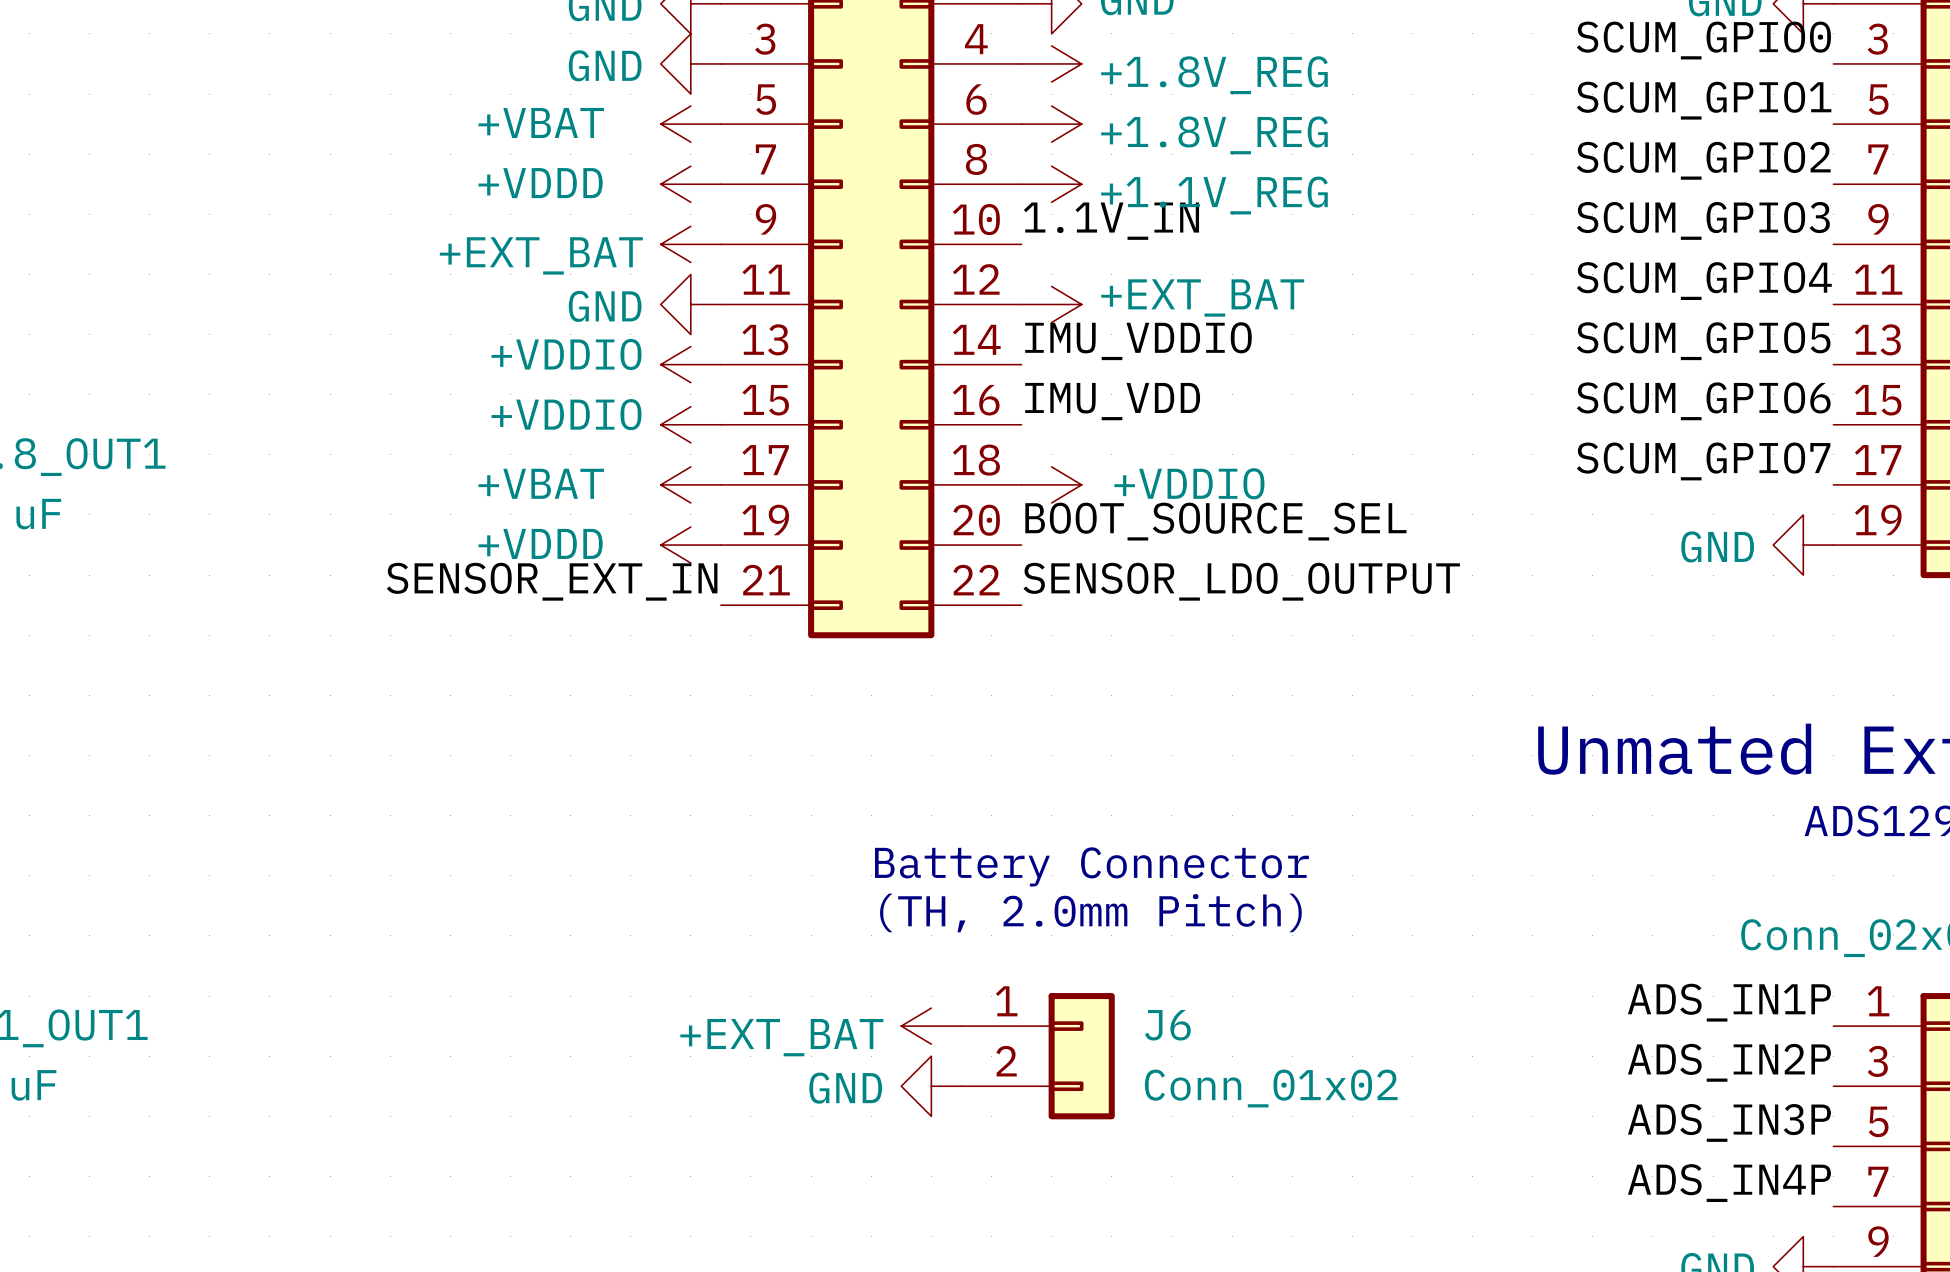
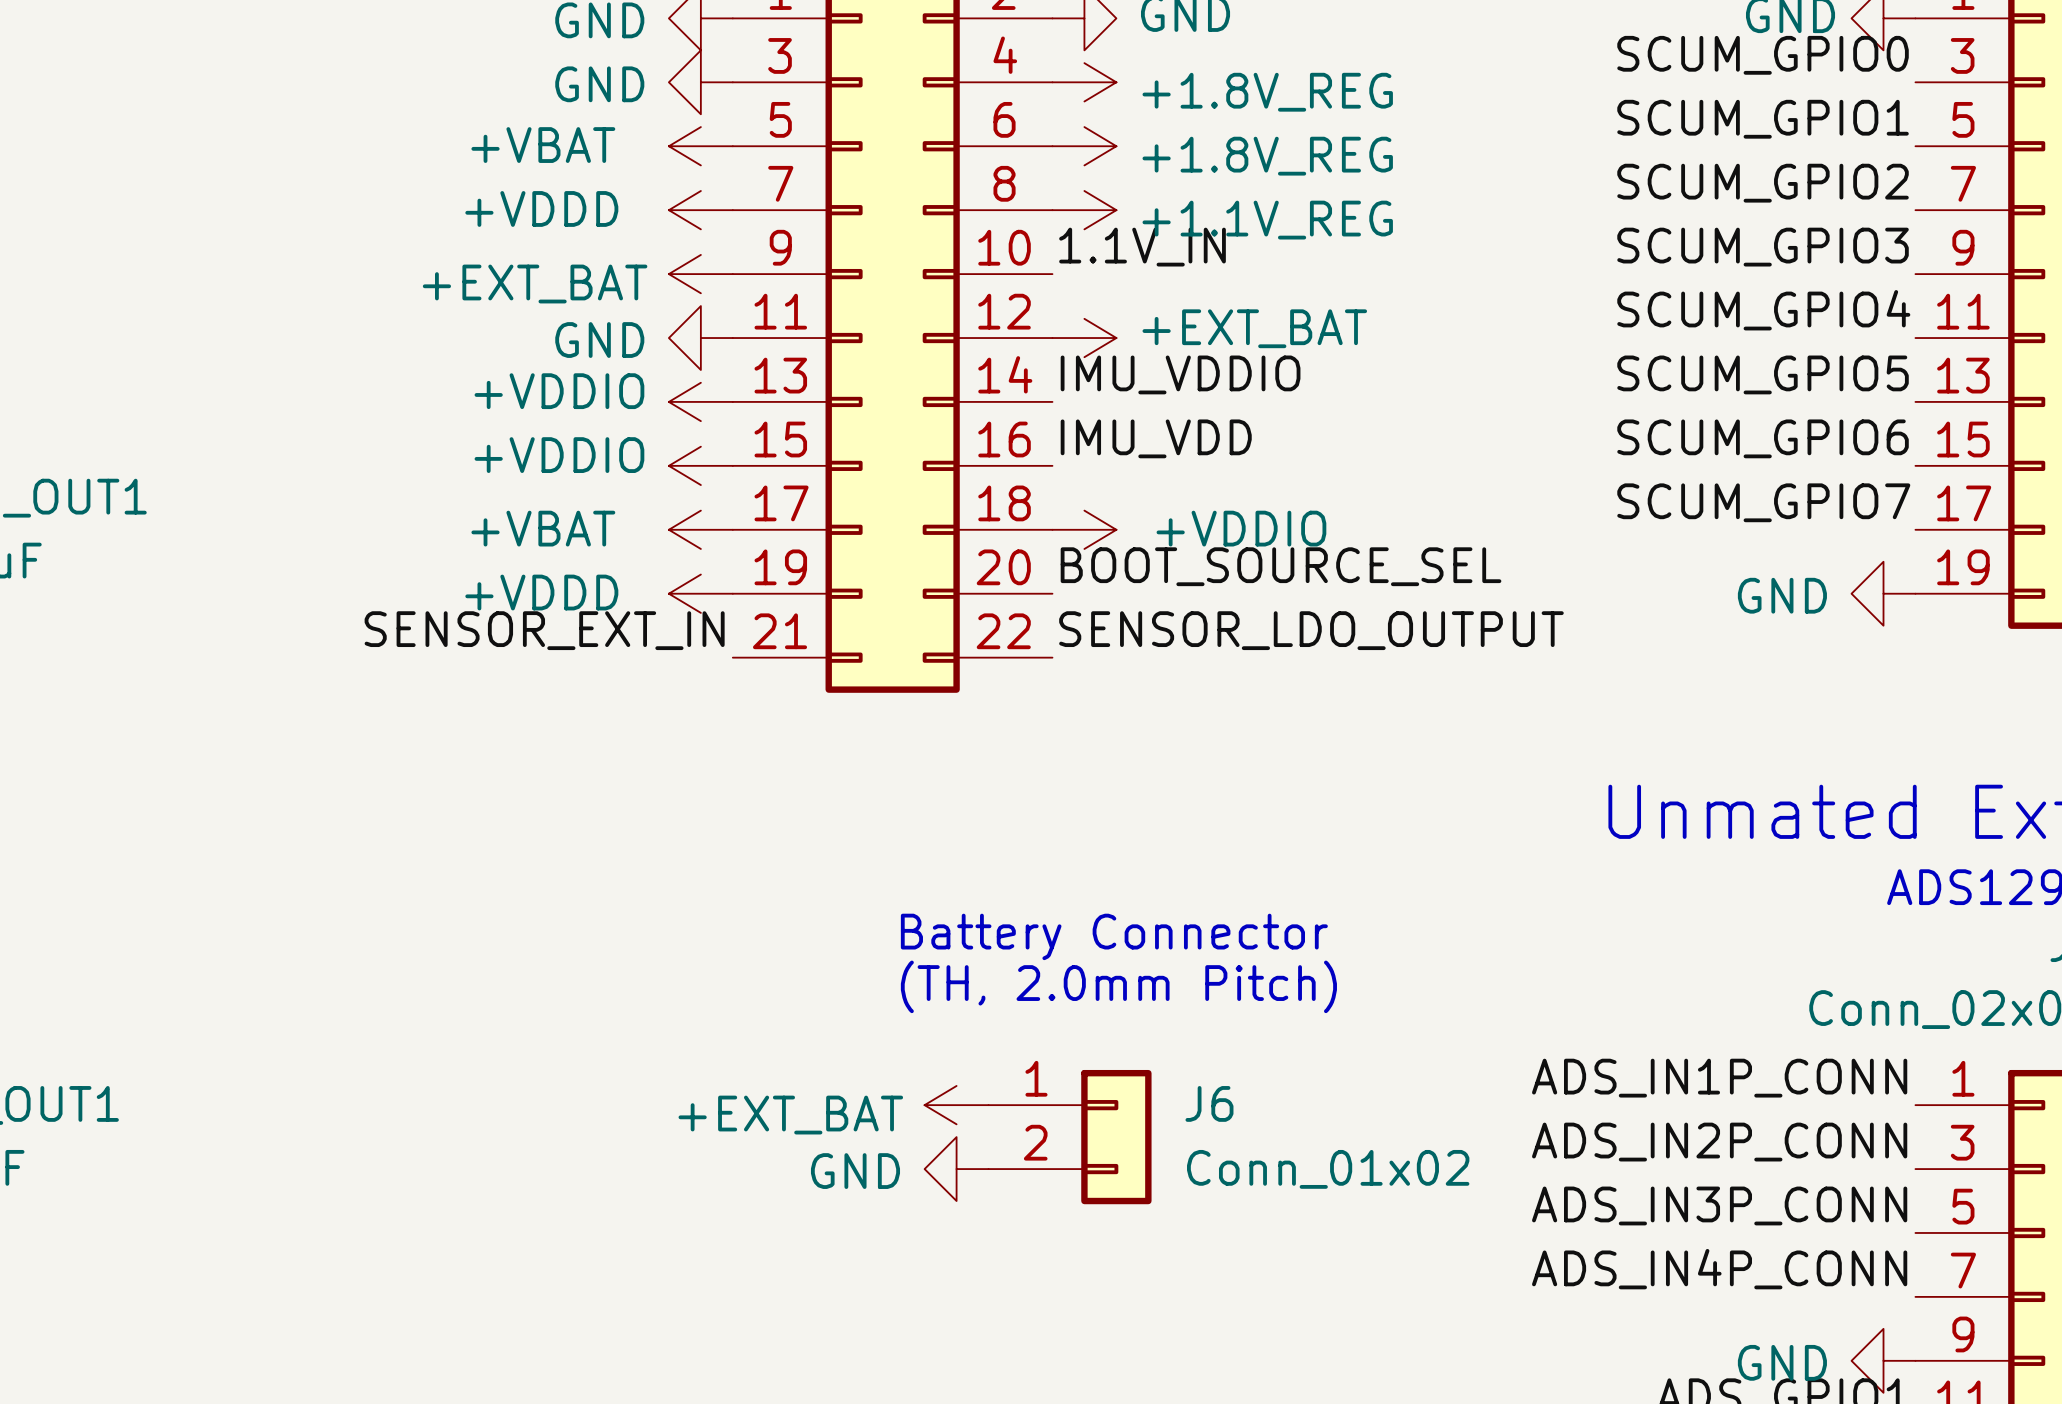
label: ADS_IN1P (1729, 1002) -> ADS_IN1P_CONN (1719, 1078)
label: ADS_IN2P (1729, 1062) -> ADS_IN2P_CONN (1719, 1142)
label: ADS_IN3P (1729, 1122) -> ADS_IN3P_CONN (1719, 1205)
label: ADS_IN4P (1729, 1183) -> ADS_IN4P_CONN (1719, 1269)

